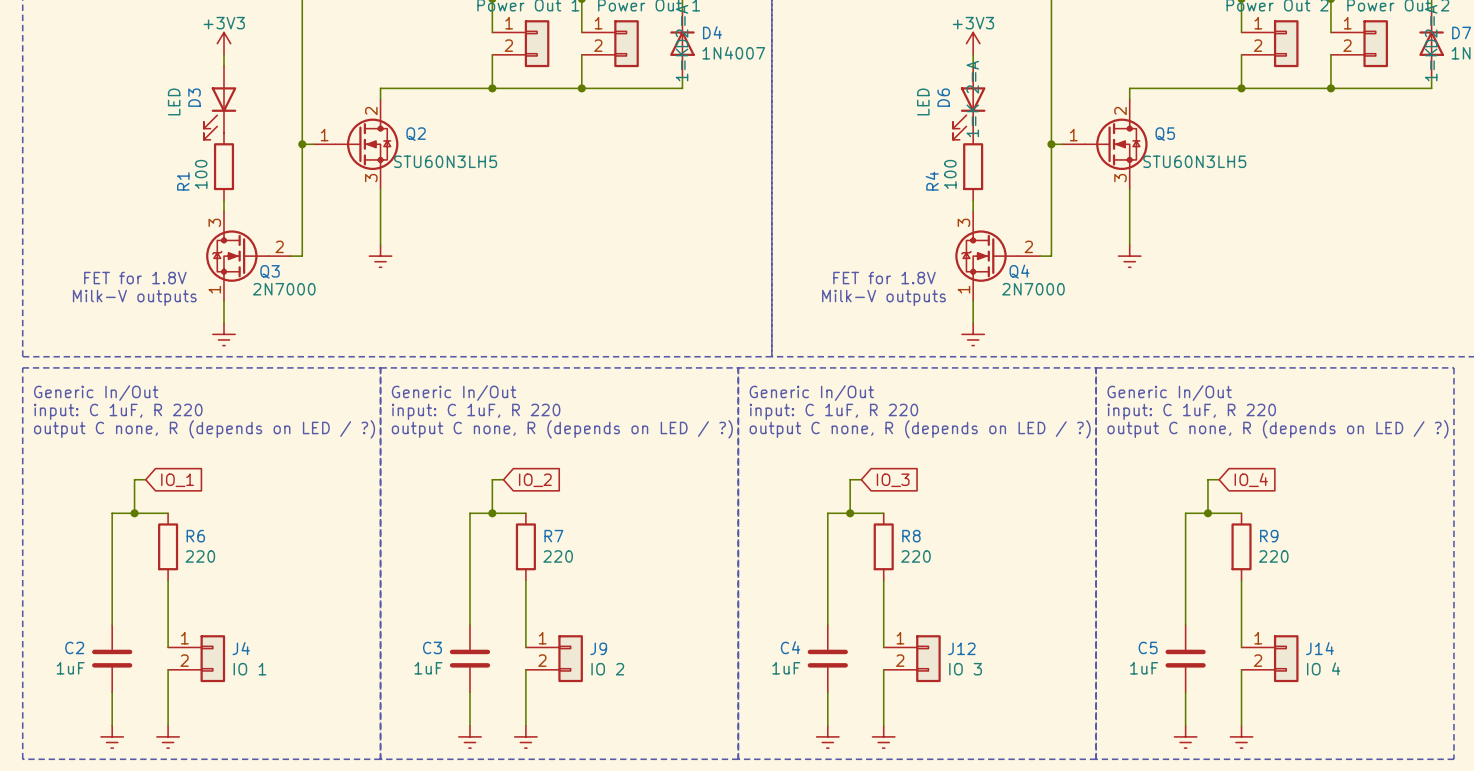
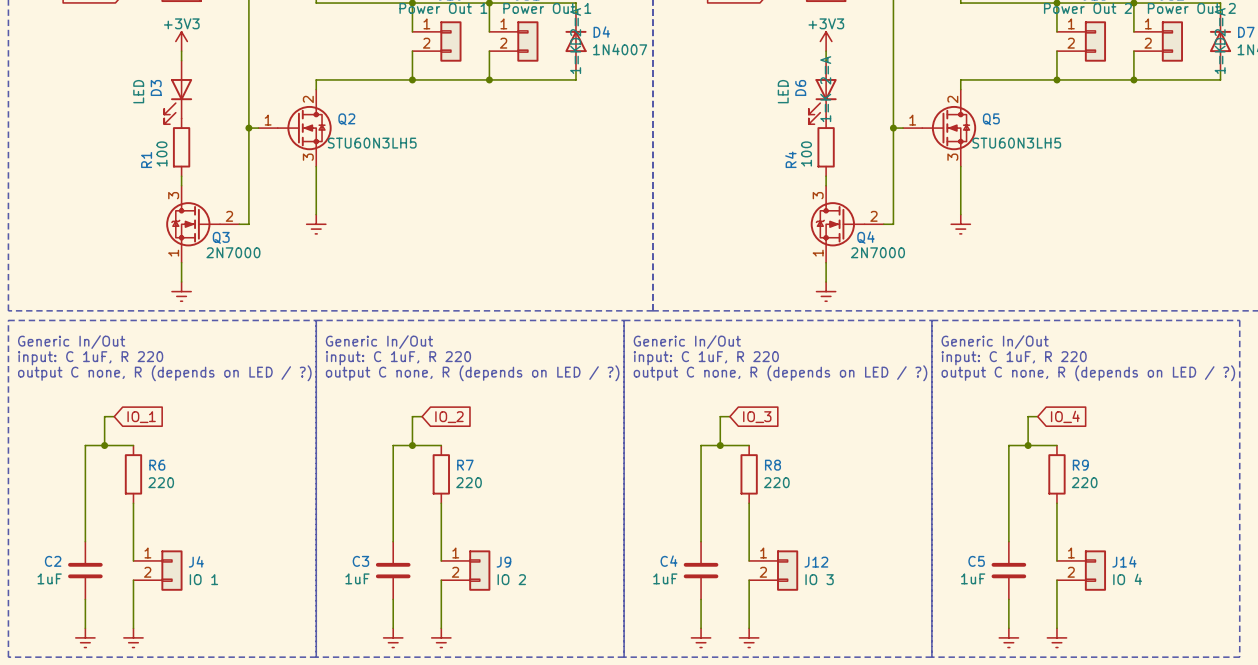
text: FET for 1.8V (135, 278) -> none
text: FET for 1.8V (884, 278) -> none
text: Milk-V outputs (134, 297) -> none
text: Milk-V outputs (883, 297) -> none

